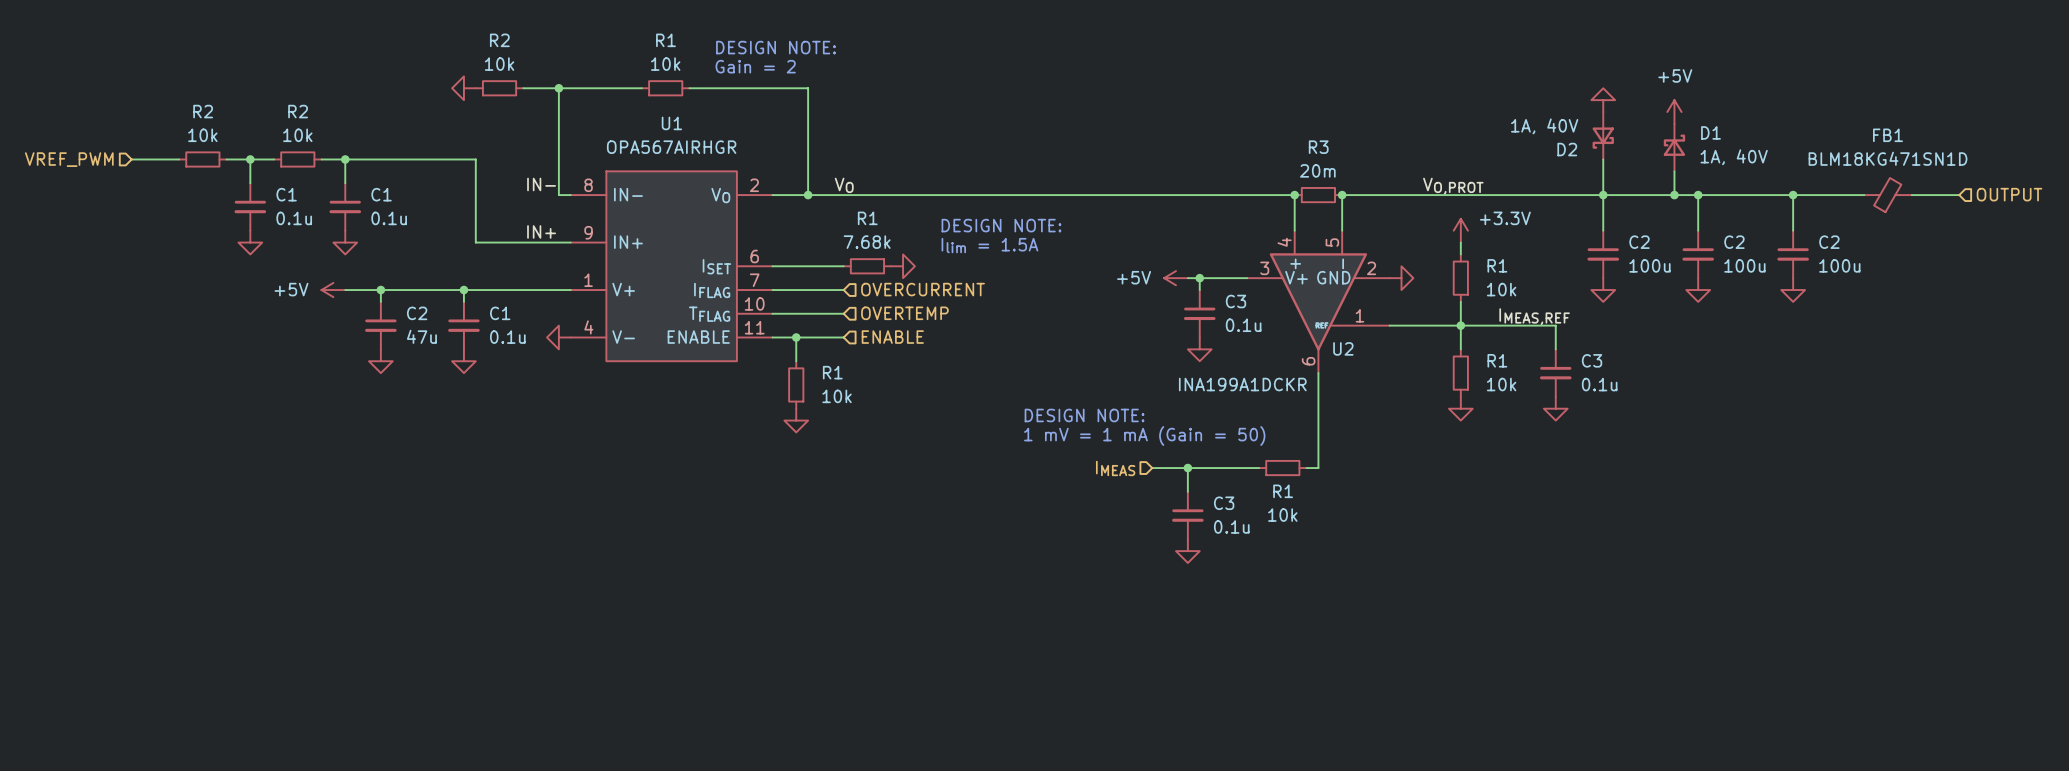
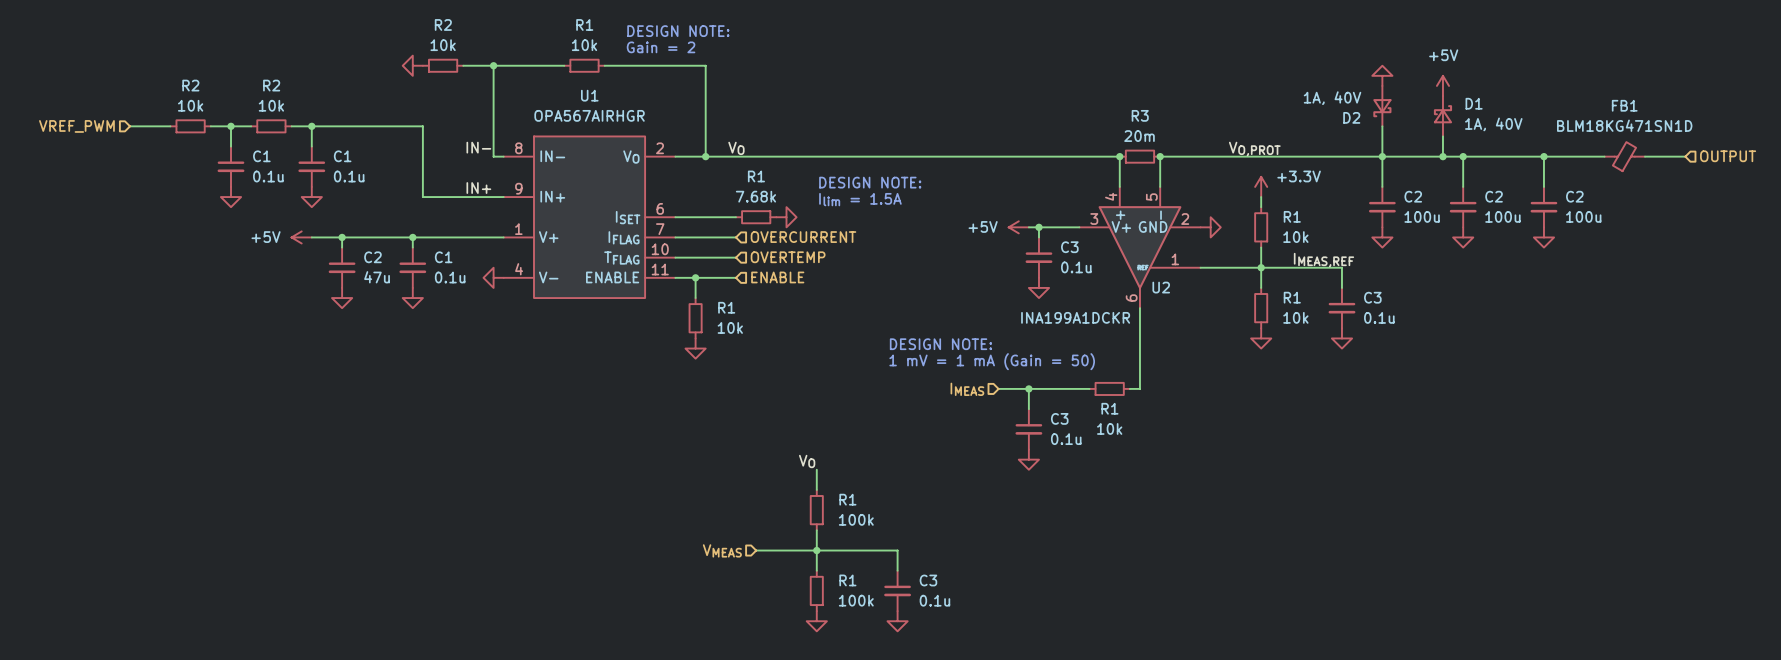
label: none -> VO (807, 461)
wire: none -> (816, 469) (816, 489)
R1: none -> 100k (816, 510)
wire: none -> (816, 530) (816, 570)
wire: none -> (756, 550) (897, 550) (897, 570)
junction: none -> (816, 550)
hierarchical label: none -> VMEAS (722, 550)
R1: none -> 100k (816, 590)
C3: none -> 0.1u (897, 590)
power symbol: none -> (816, 621)
power symbol: none -> (897, 621)

